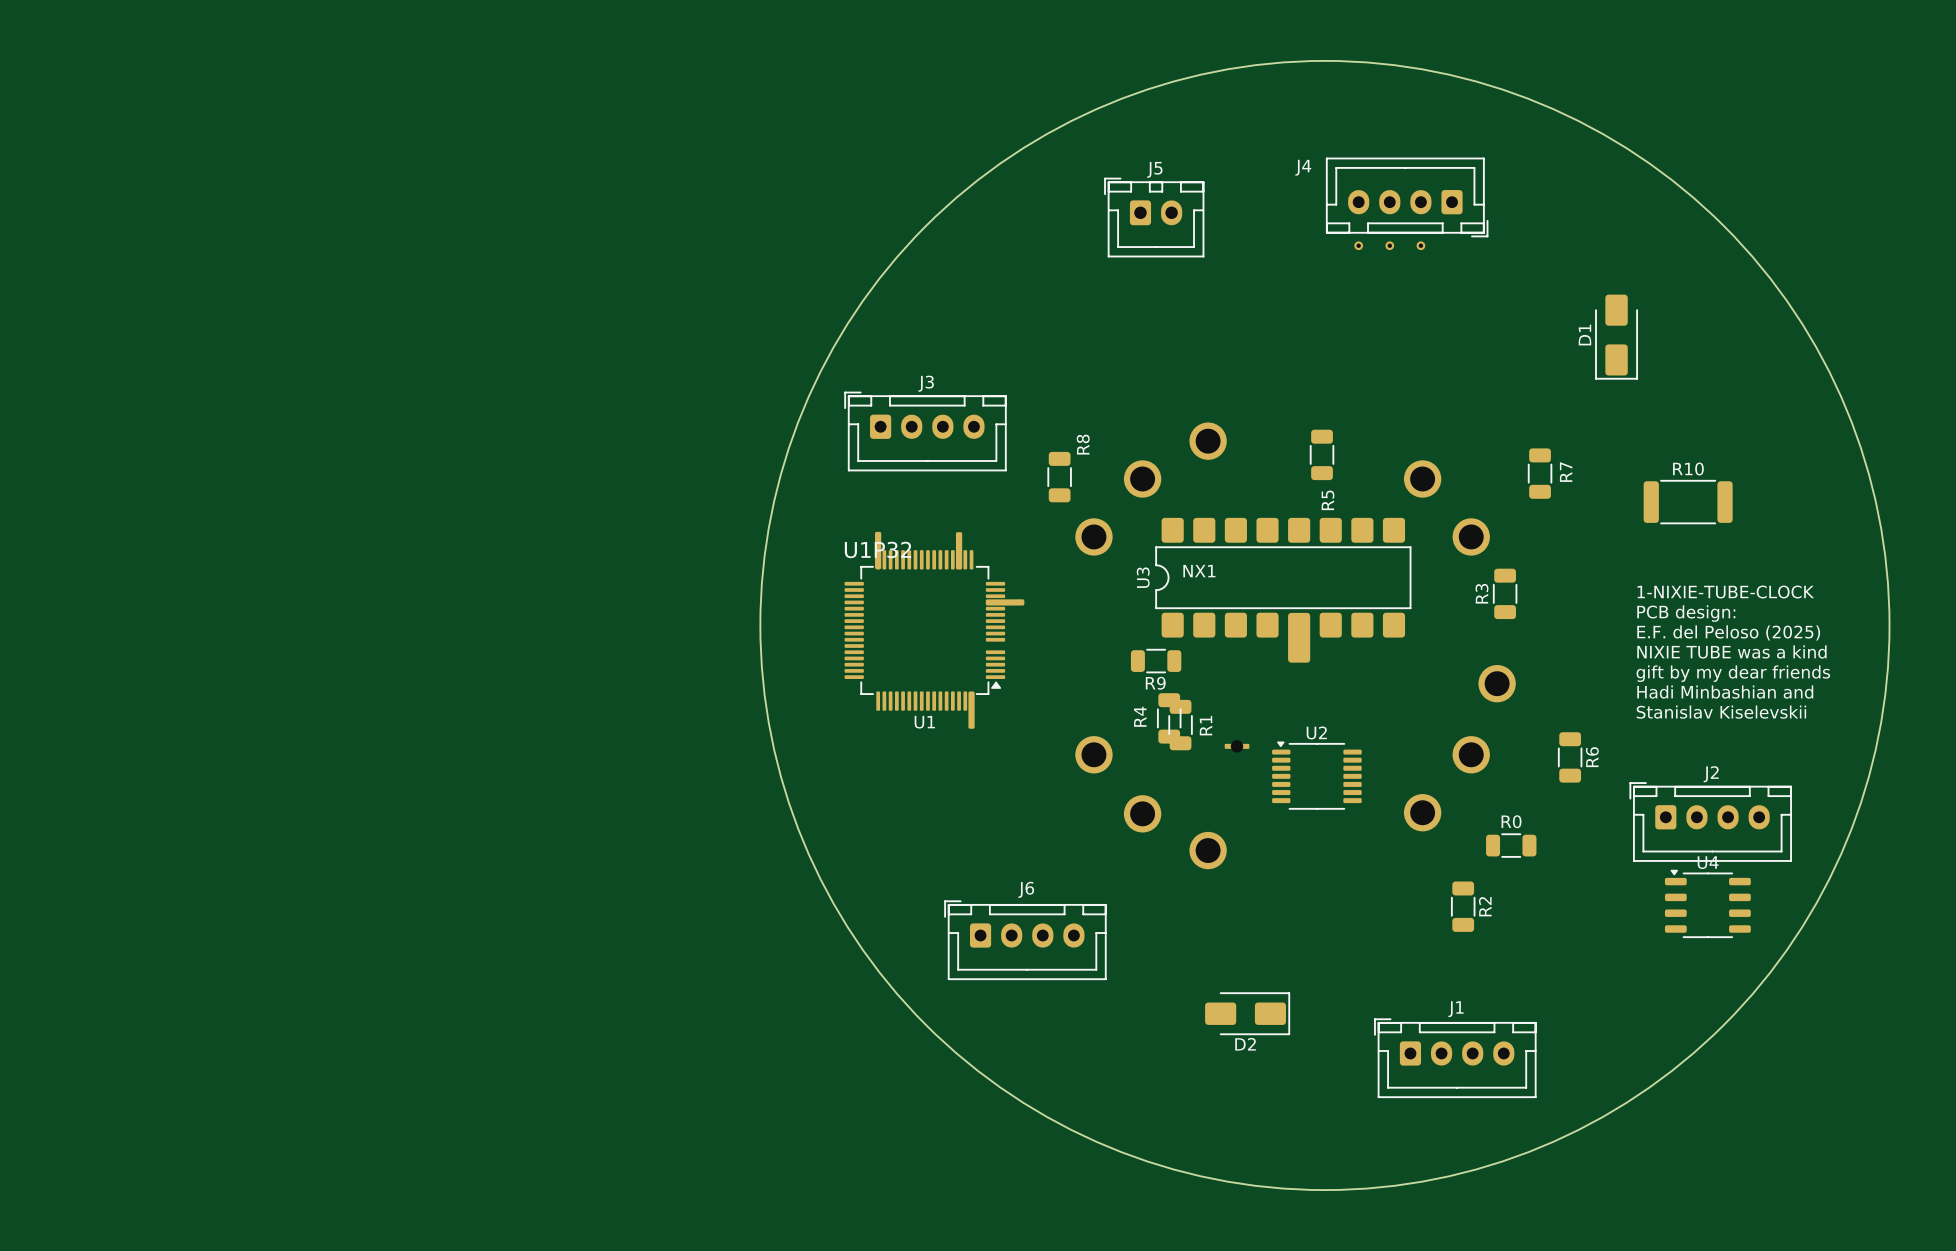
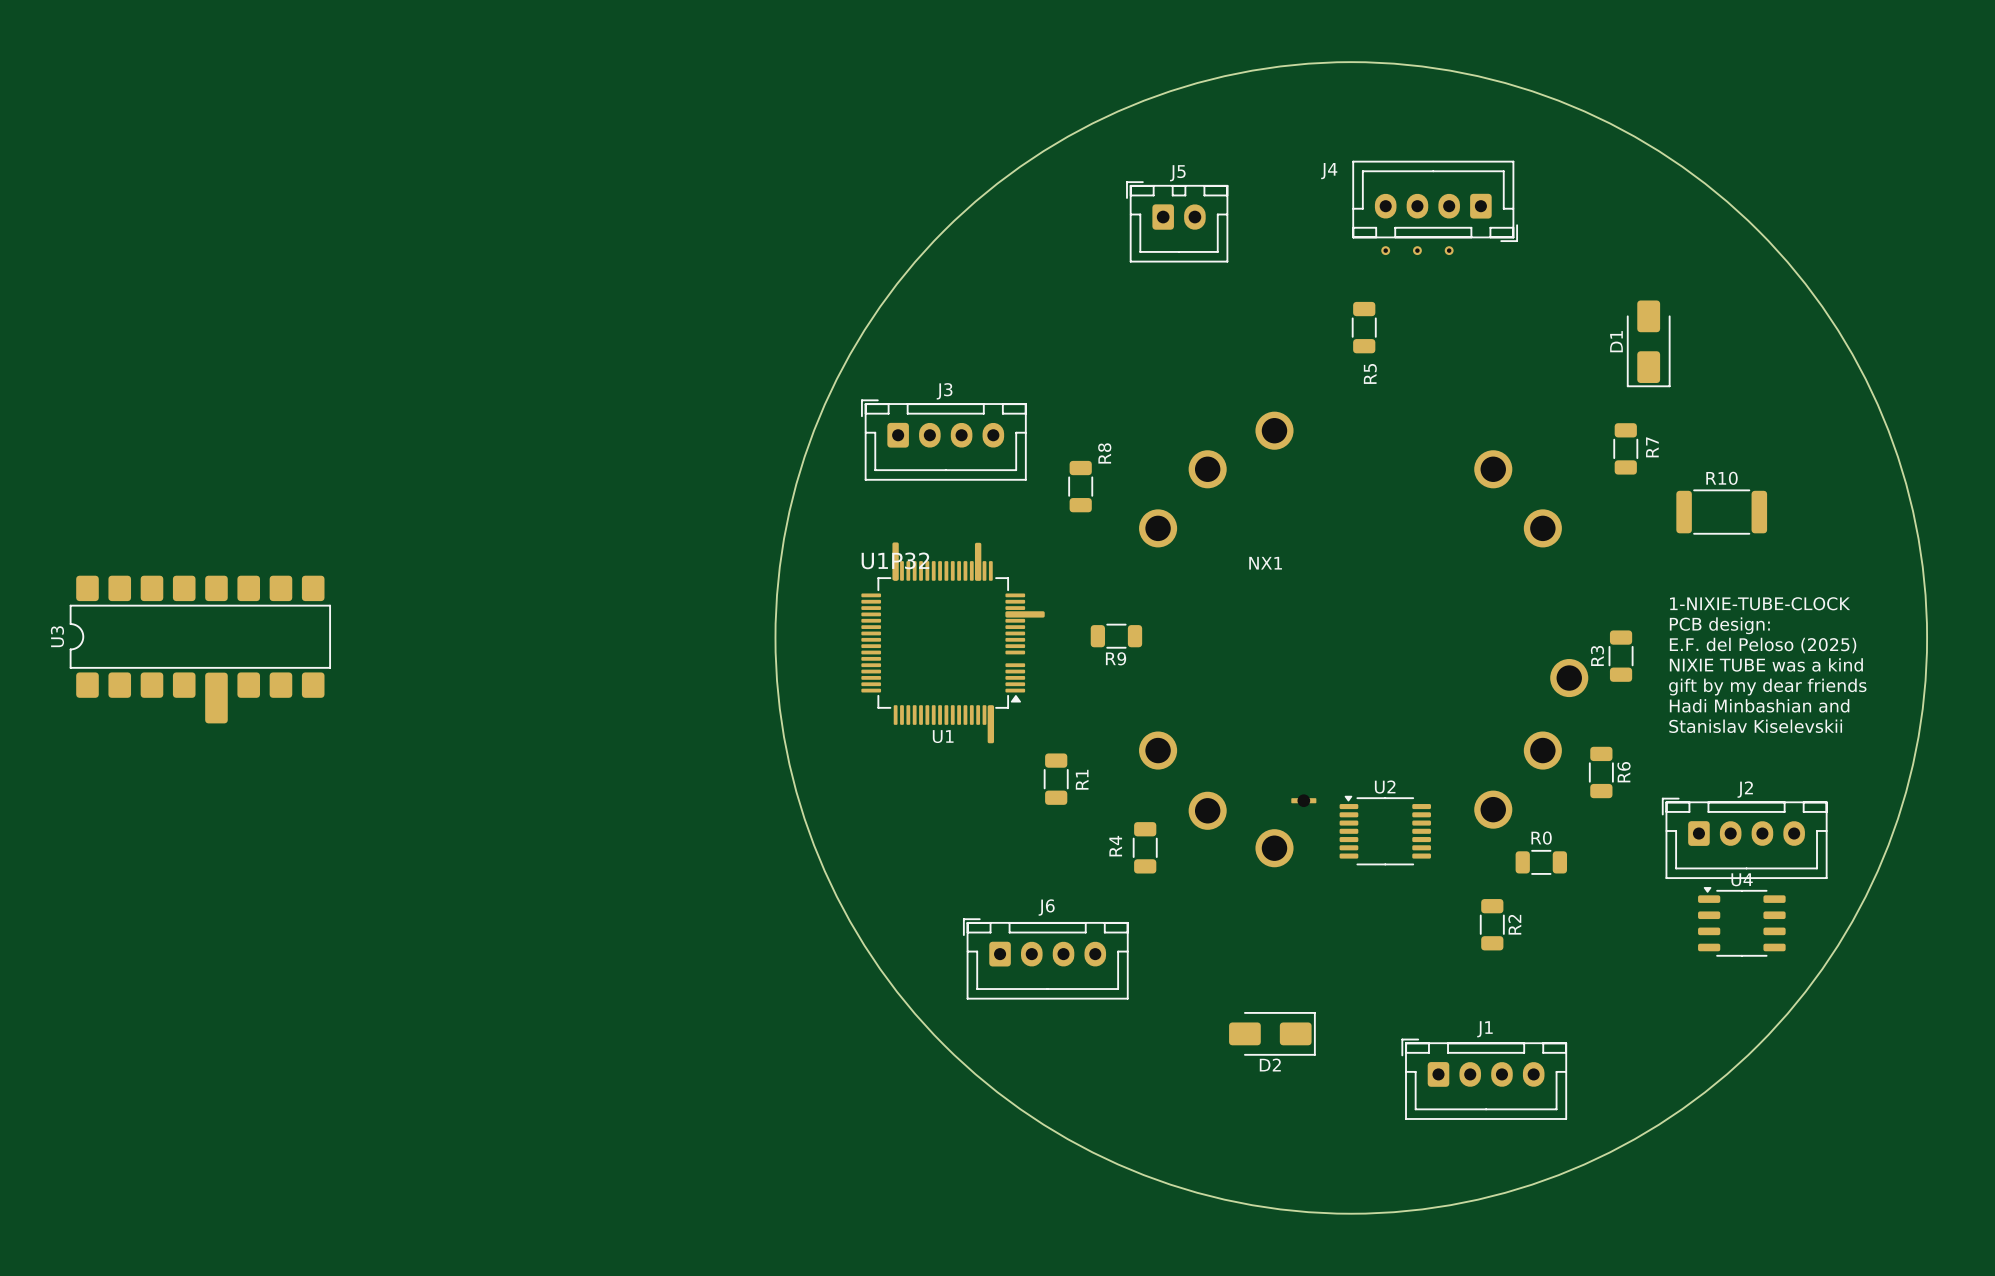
R5 position: (1322, 454) -> (1364, 327)
R7 position: (1540, 473) -> (1625, 448)
U3 position: (1283, 590) -> (200, 649)
R3 position: (1505, 593) -> (1621, 656)
NX1 position: (1295, 645) -> (1363, 639)
R9 position: (1156, 661) -> (1116, 636)
R4 position: (1169, 718) -> (1145, 847)
R1 position: (1180, 725) -> (1056, 779)
U2 position: (1293, 774) -> (1361, 829)

